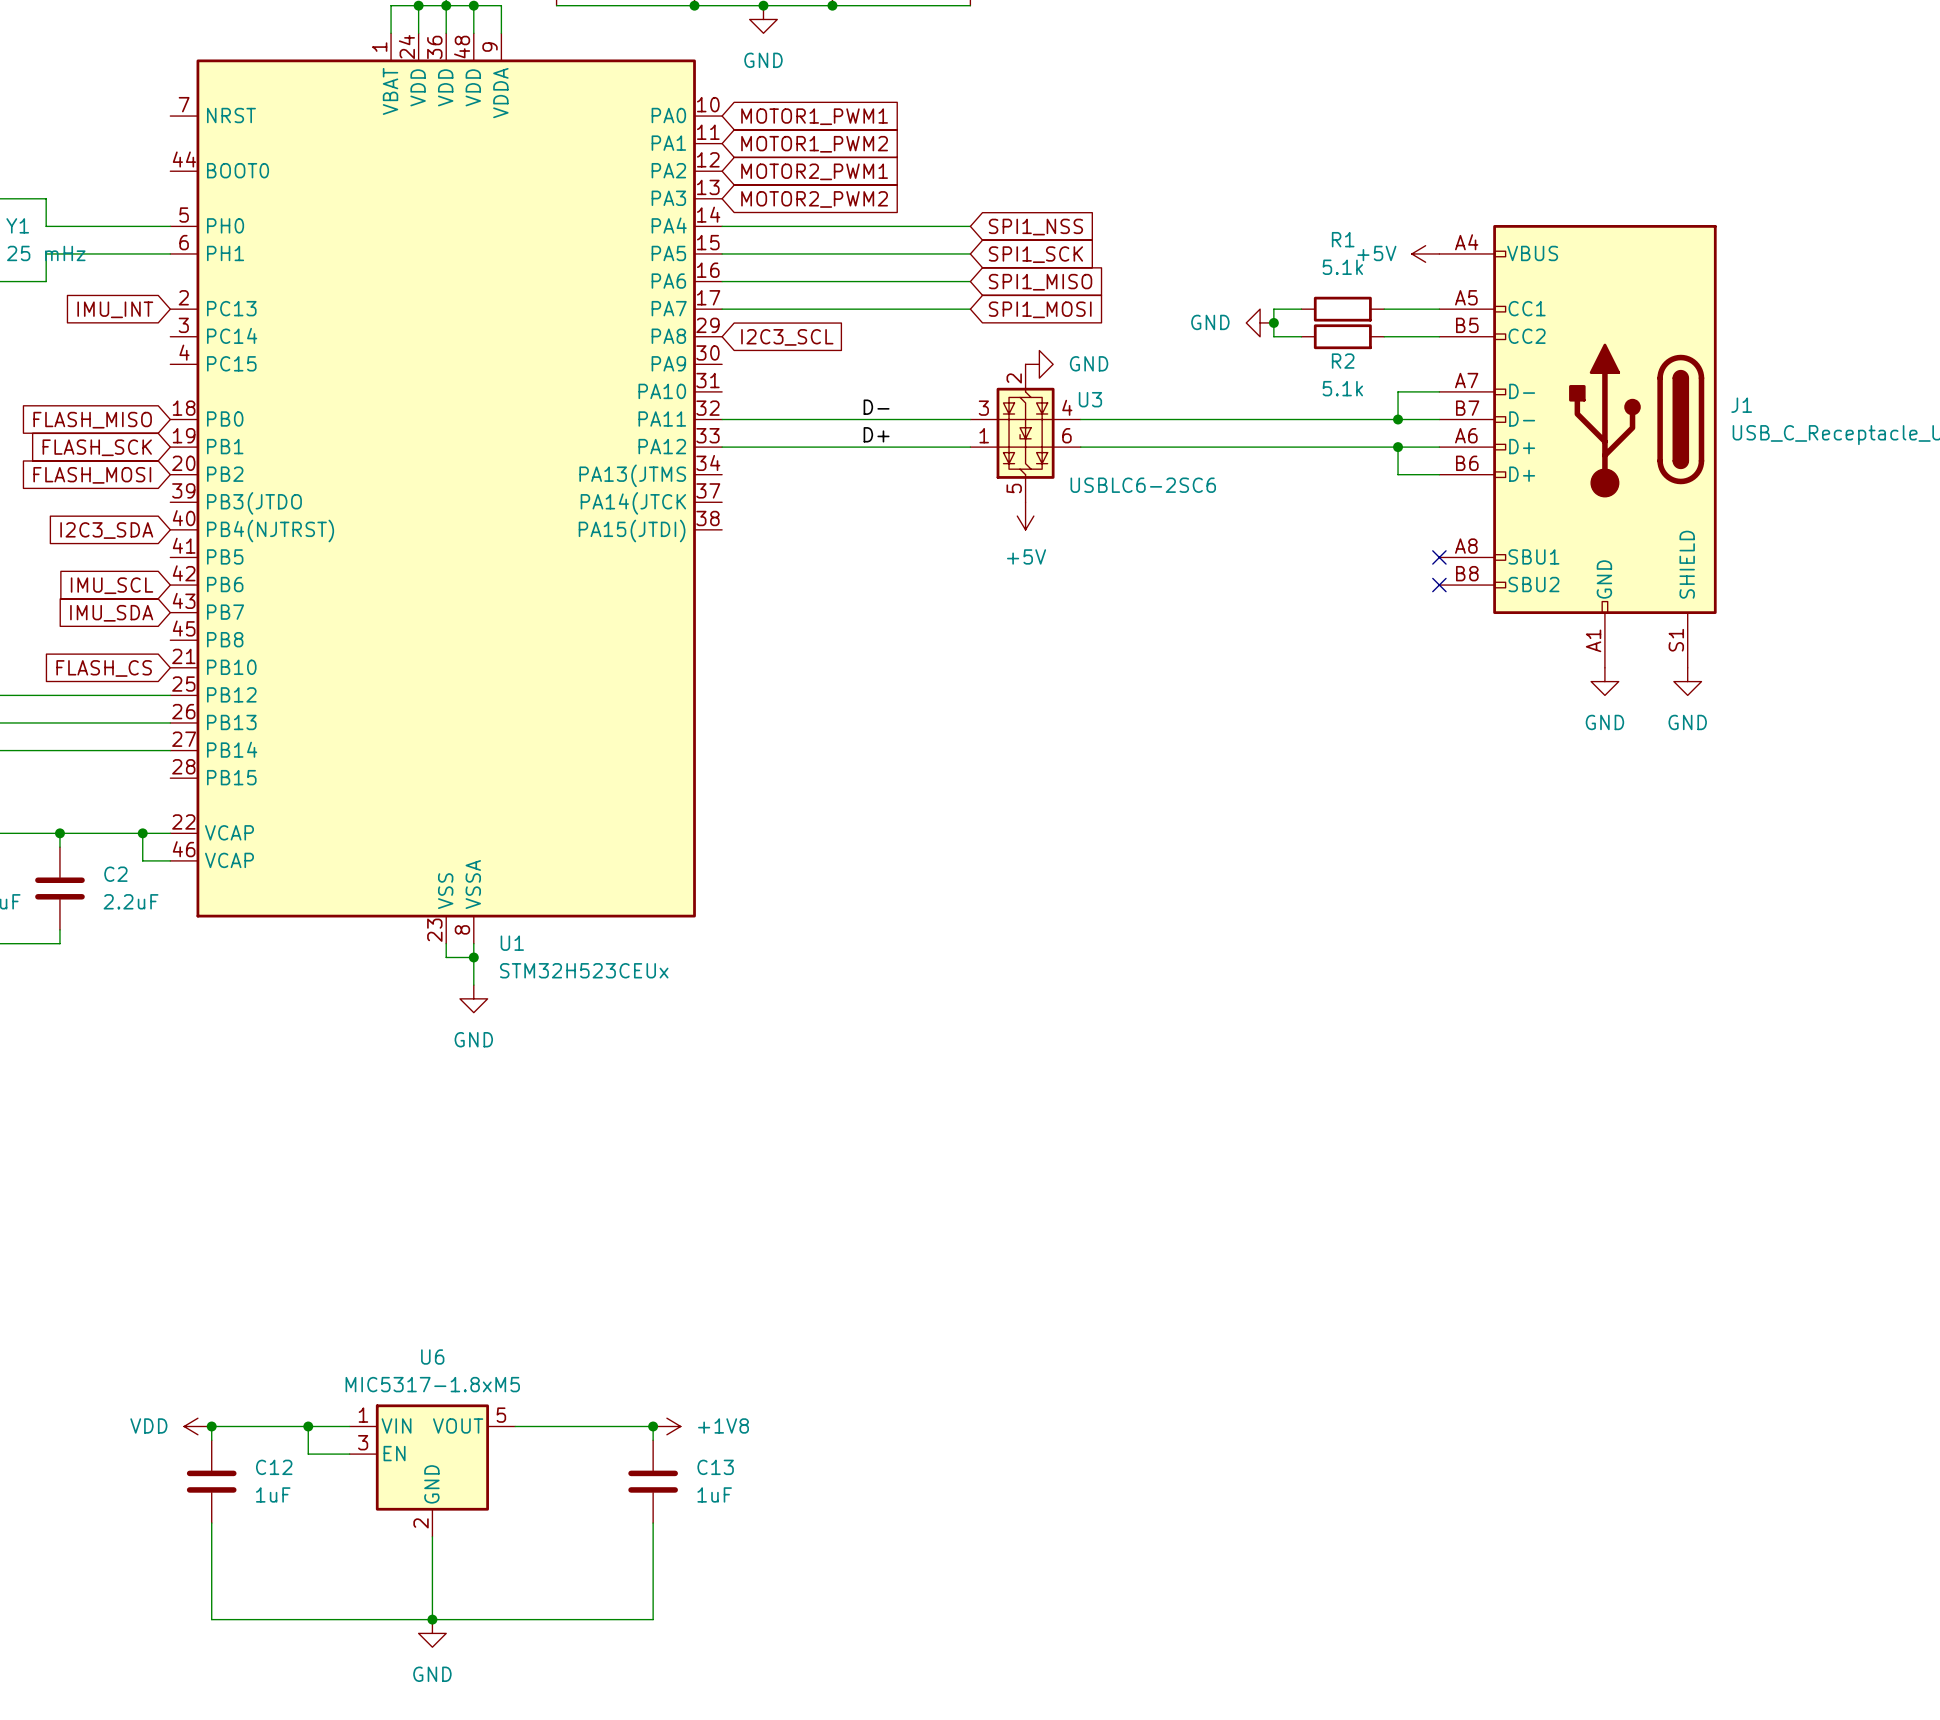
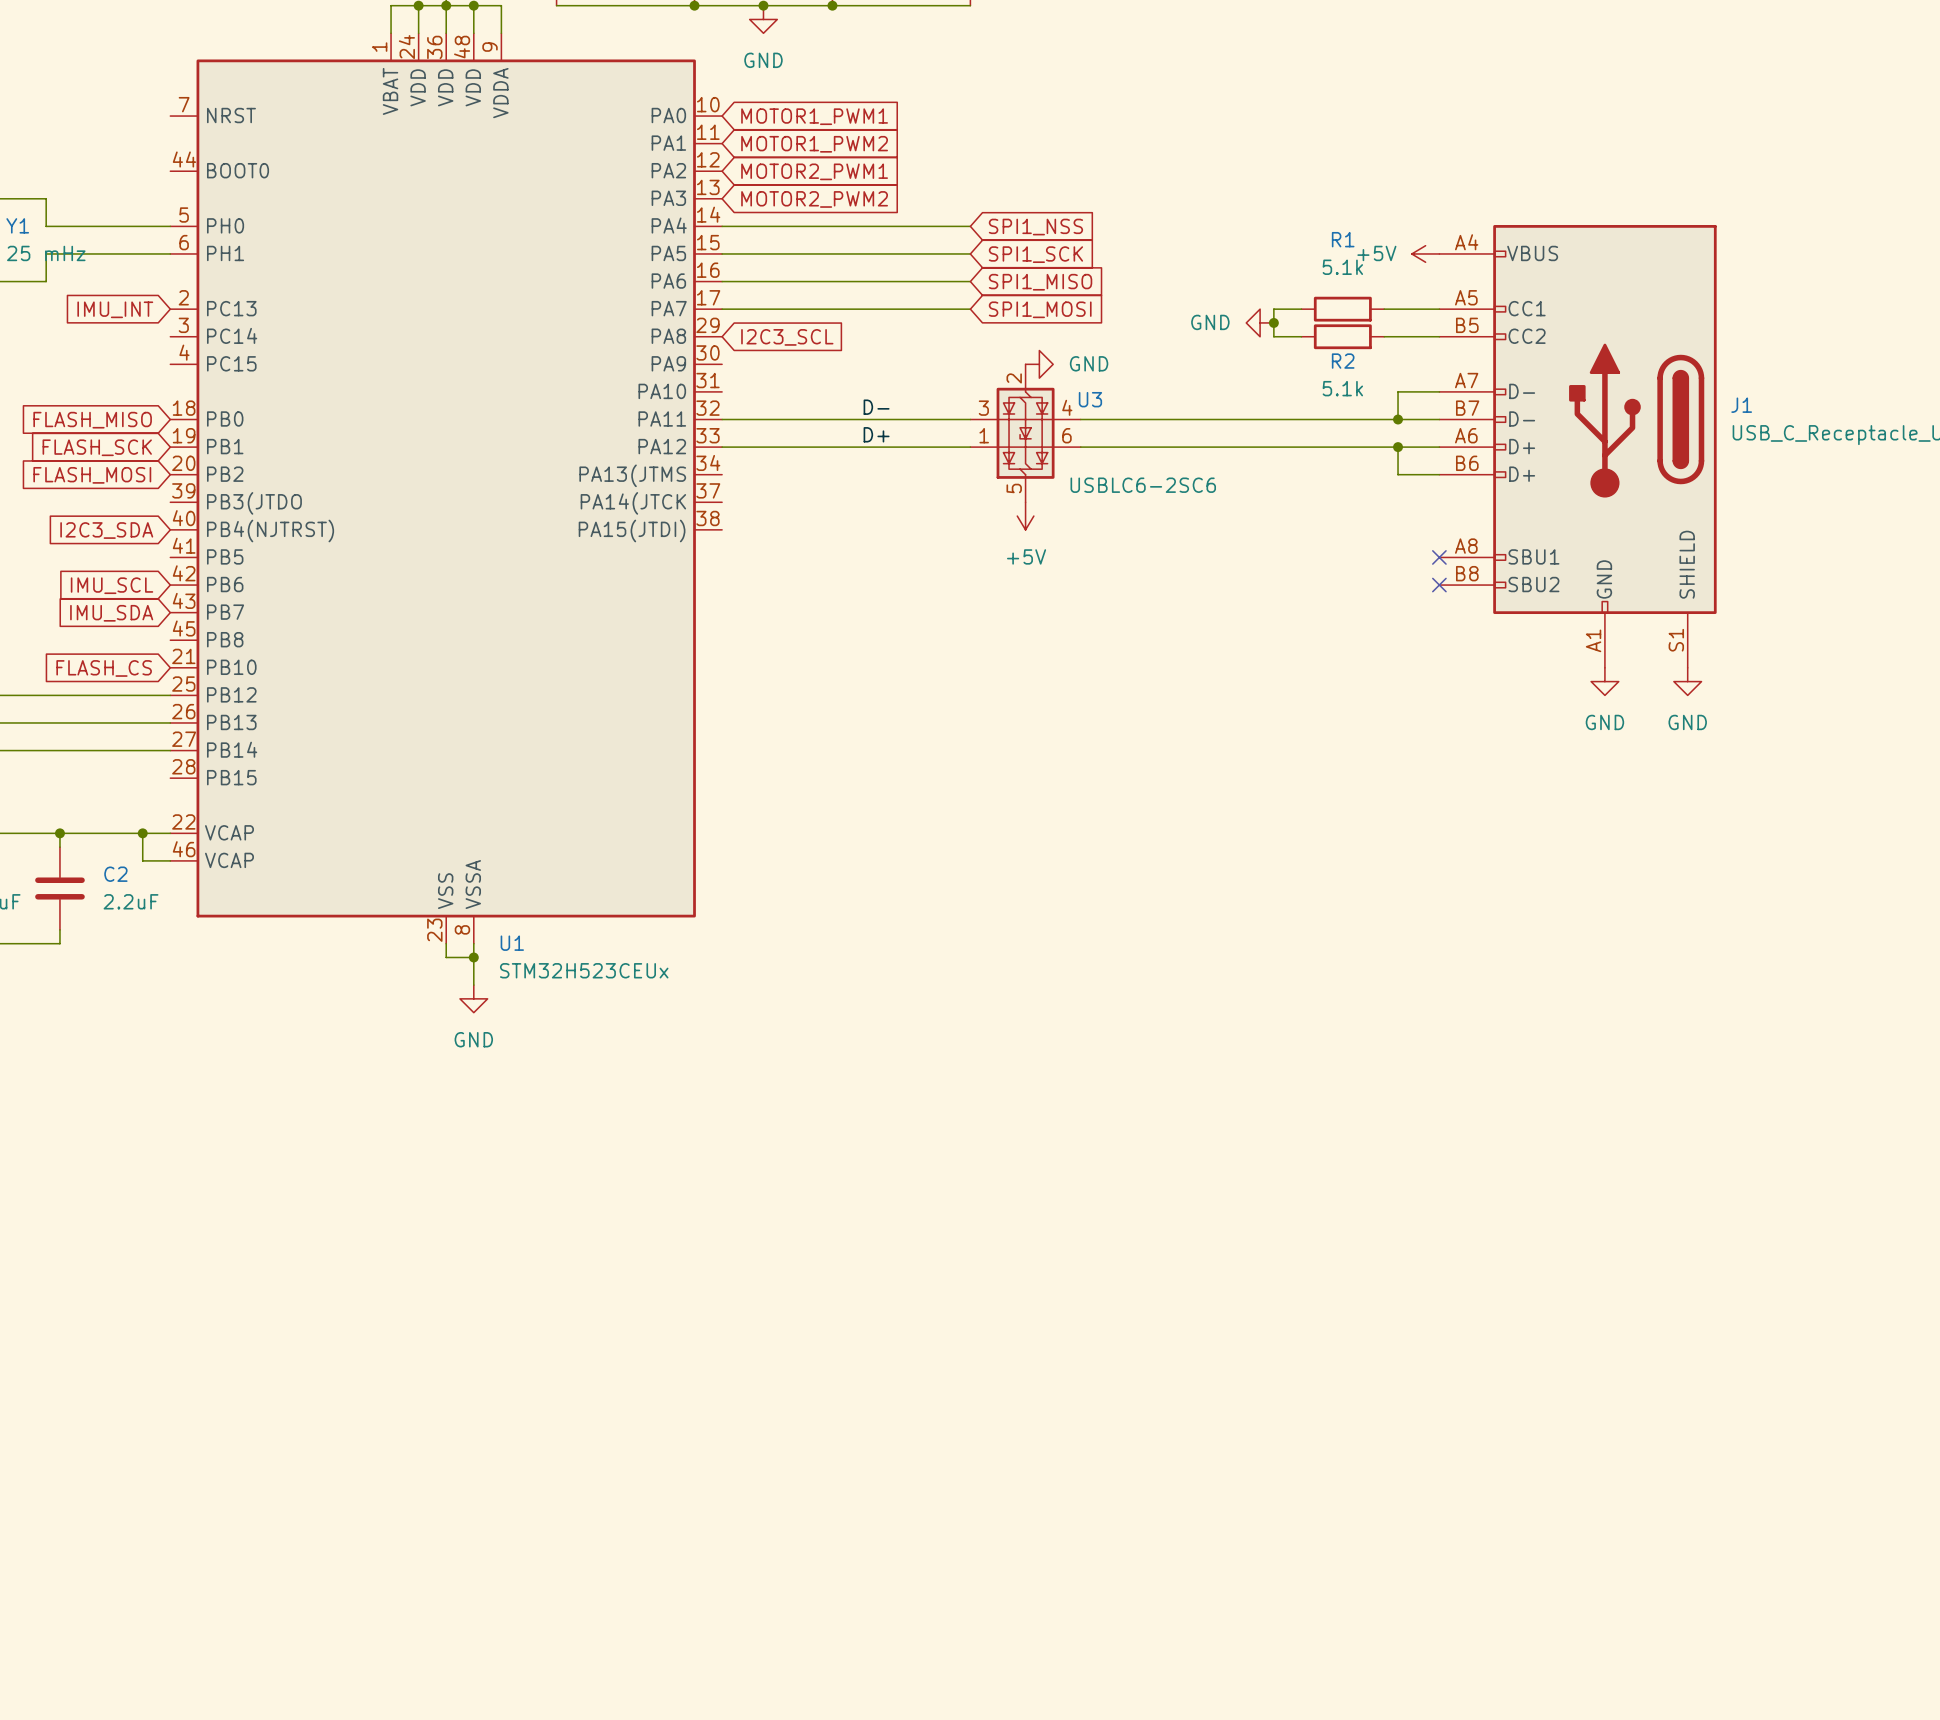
power symbol: VDD (197, 1426) -> none
junction: (211, 1426) -> none
wire: (308, 1426) (308, 1454) (349, 1454) -> none
junction: (308, 1426) -> none
wire: (349, 1426) (211, 1426) (211, 1440) -> none
wire: (515, 1426) (653, 1426) (653, 1440) -> none
junction: (653, 1426) -> none
power symbol: +1V8 (666, 1426) -> none
U6: MIC5317-1.8xM5 (432, 1470) -> none
C12: 1uF (211, 1481) -> none
C13: 1uF (653, 1481) -> none
wire: (211, 1523) (211, 1619) (653, 1619) (653, 1523) -> none
wire: (432, 1536) (432, 1619) -> none
junction: (432, 1619) -> none
power symbol: GND (432, 1633) -> none

